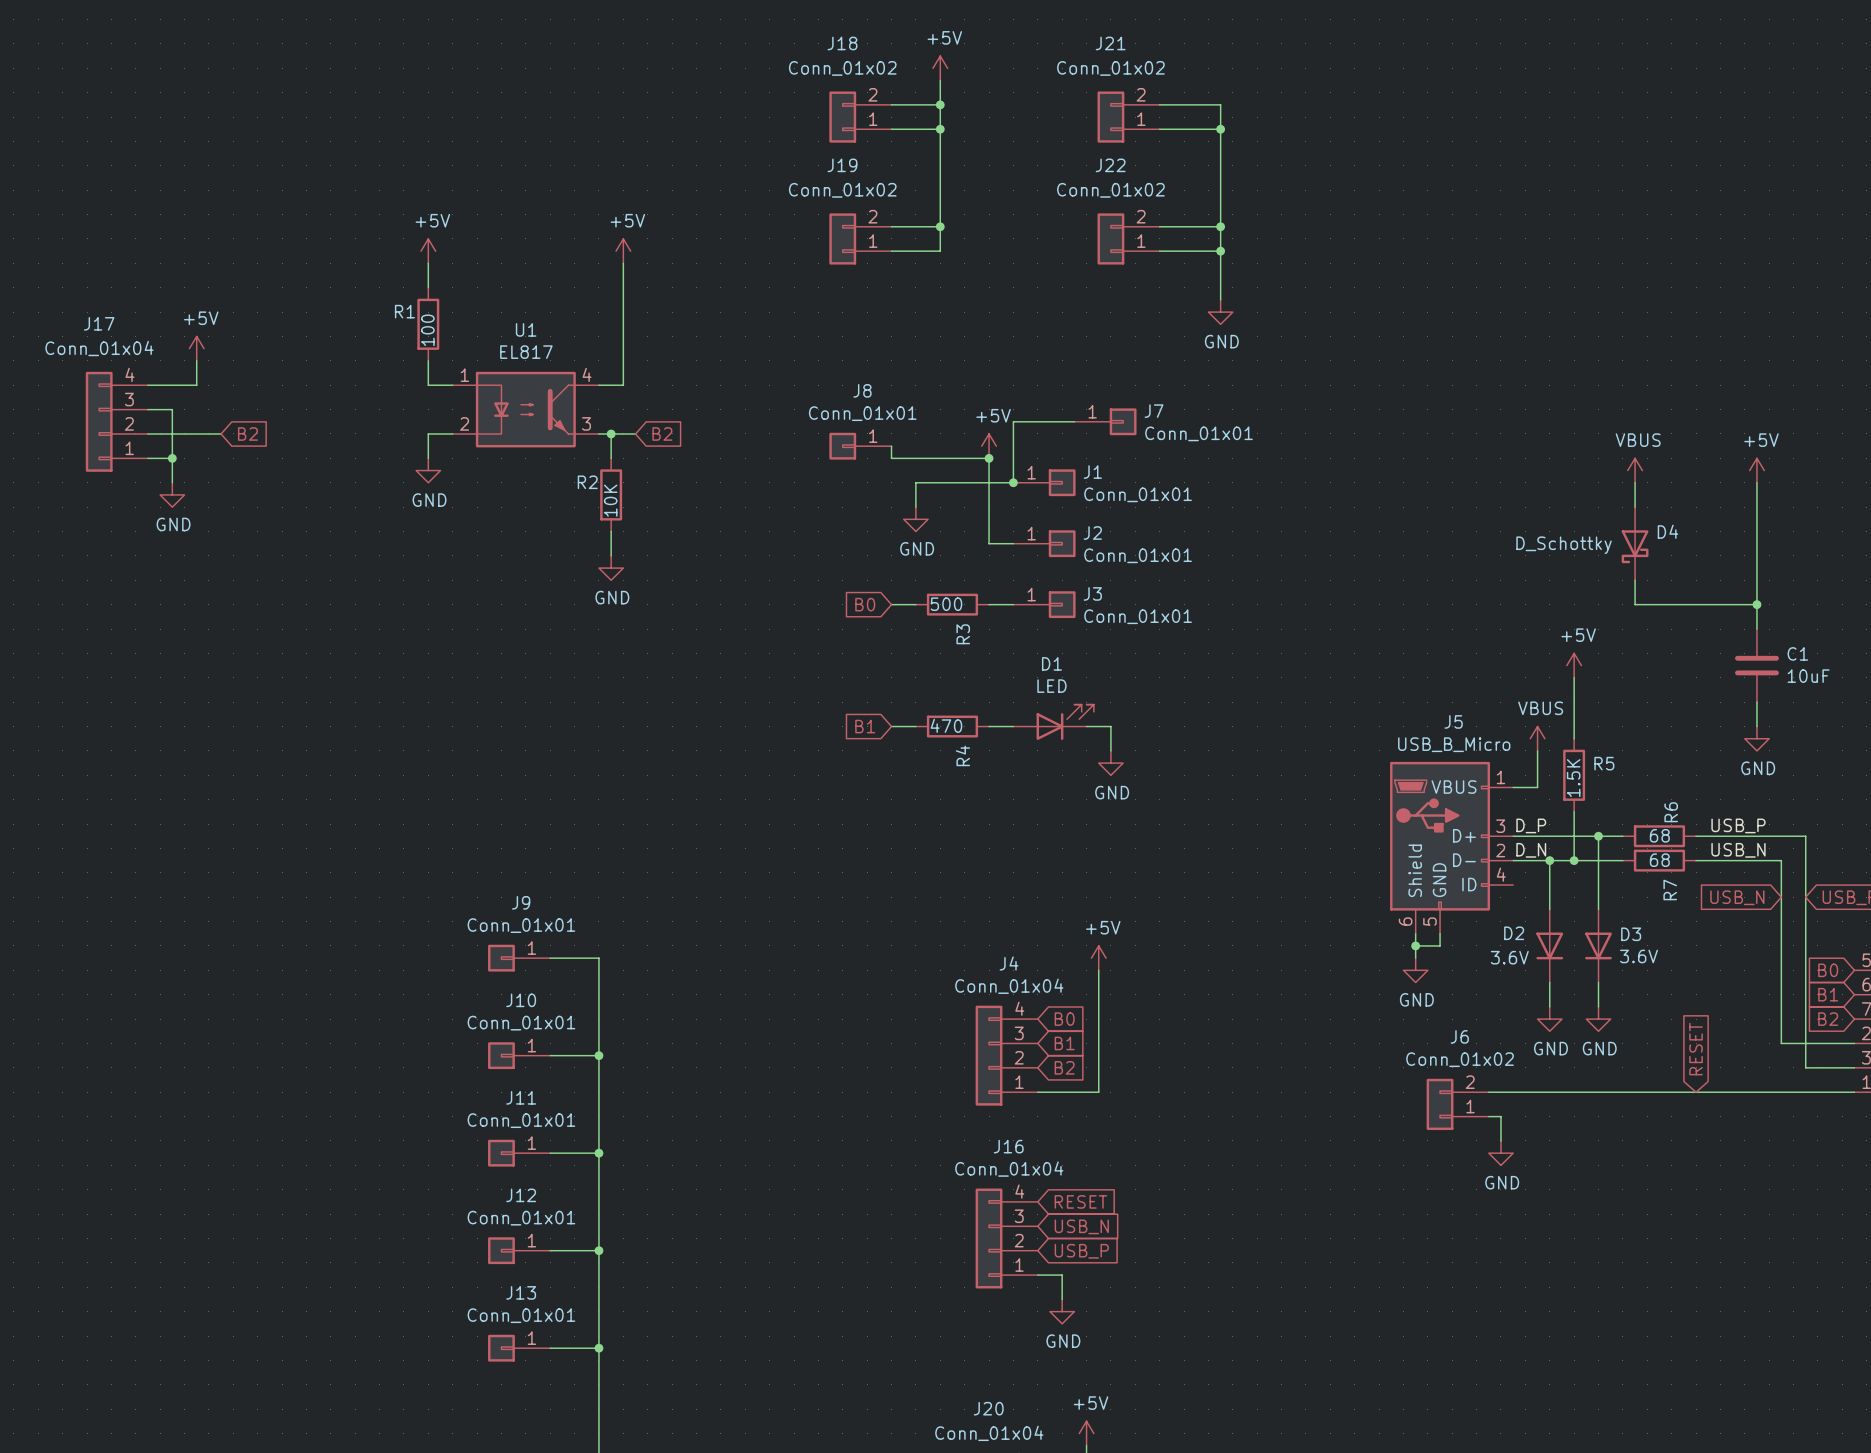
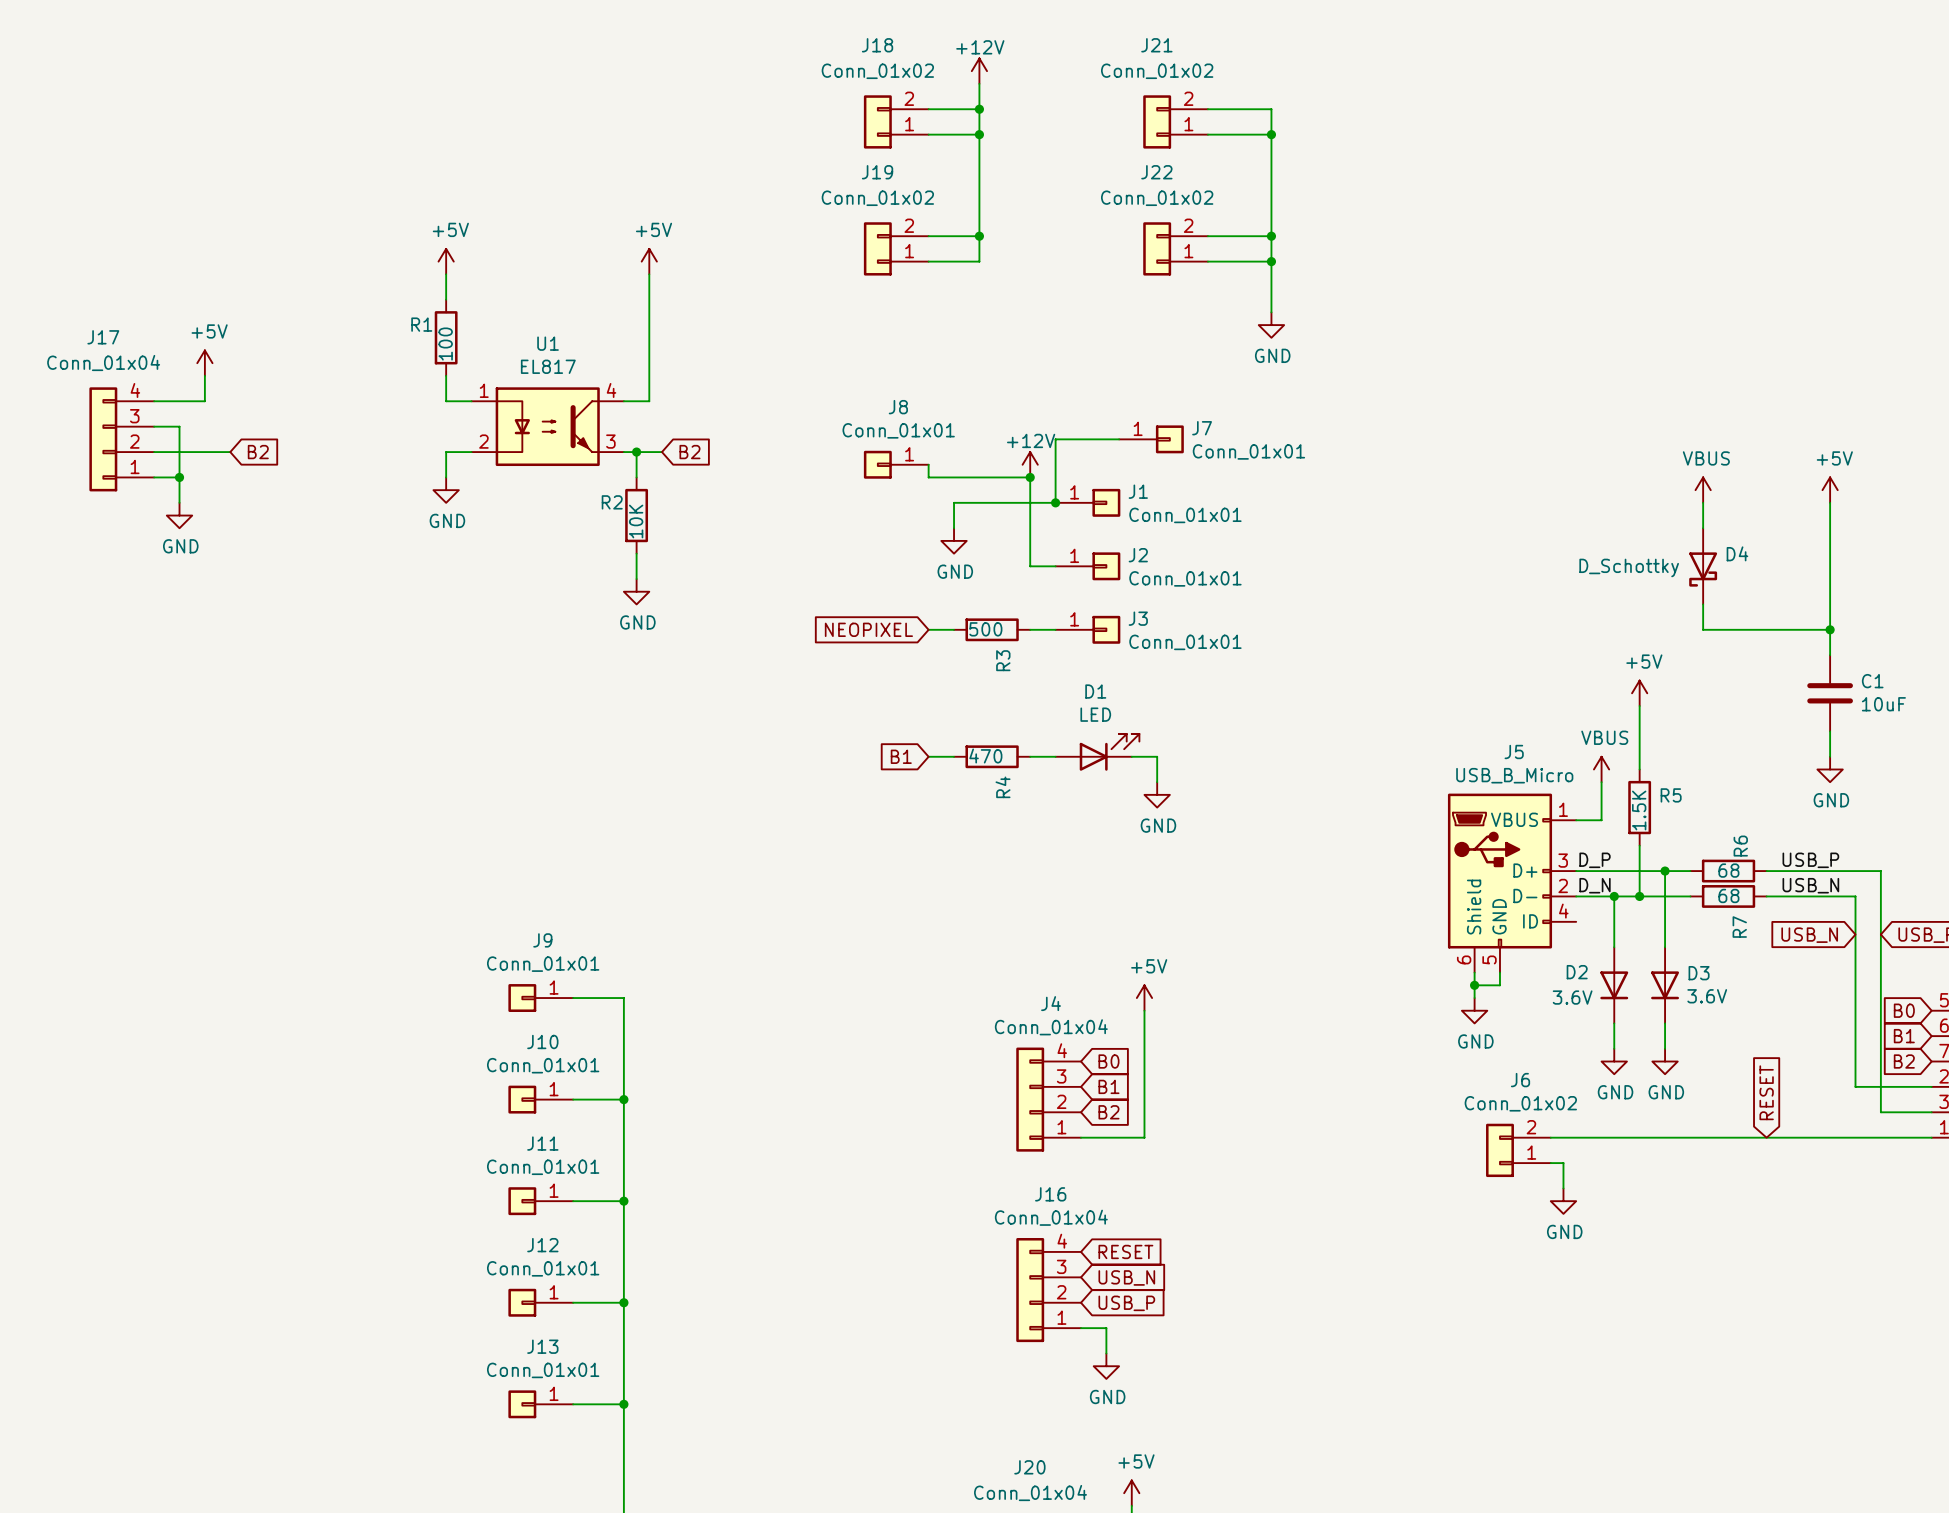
power symbol: +5V (940, 68) -> +12V (979, 71)
power symbol: +5V (989, 446) -> +12V (1030, 464)
global label: B0 (865, 604) -> NEOPIXEL (868, 629)

